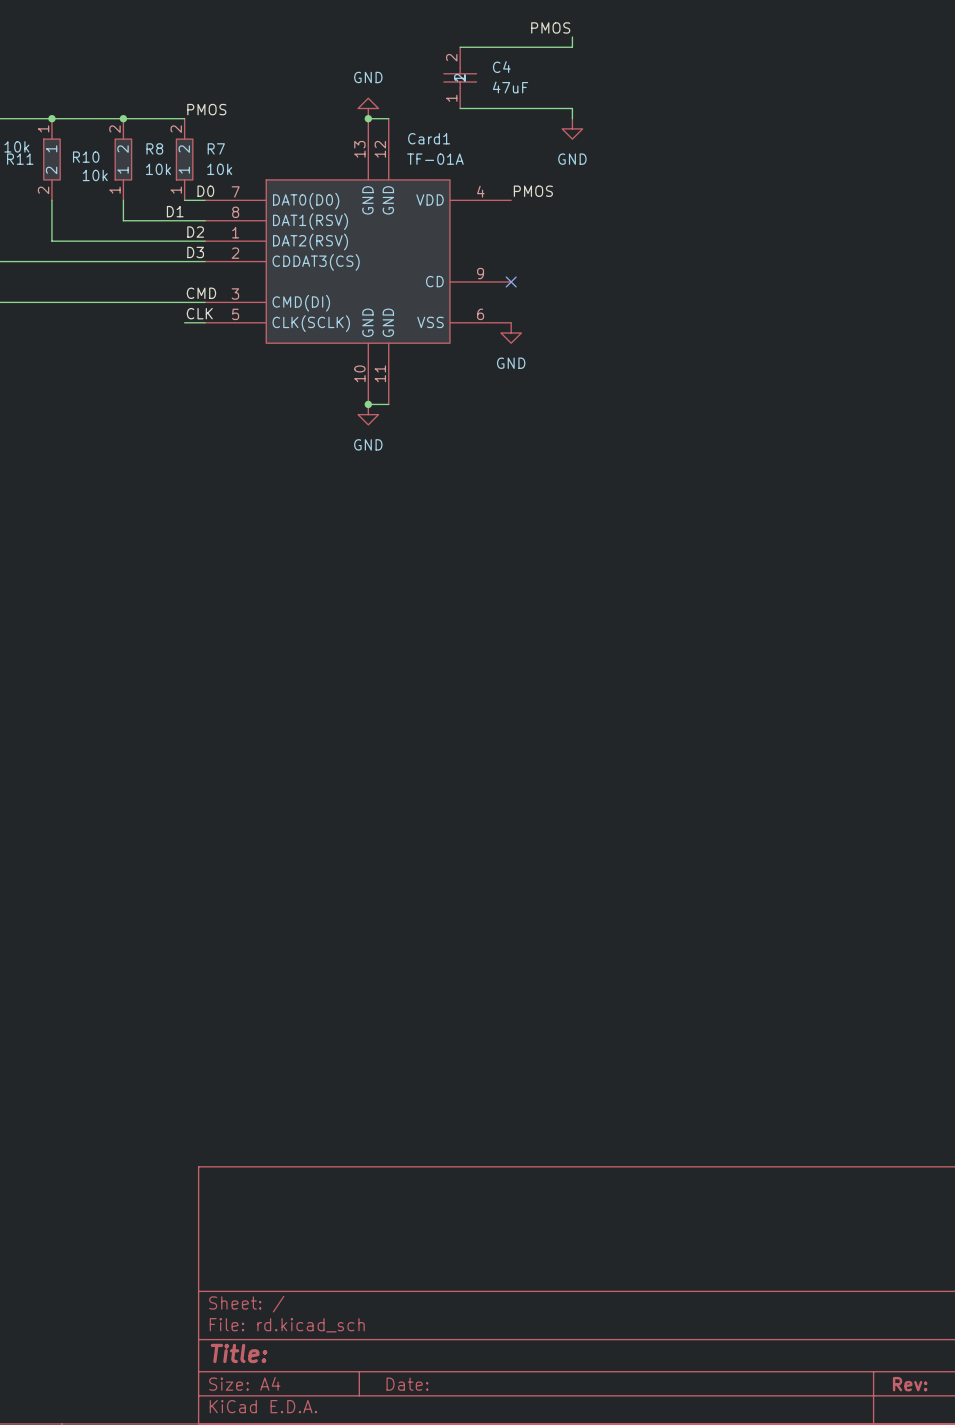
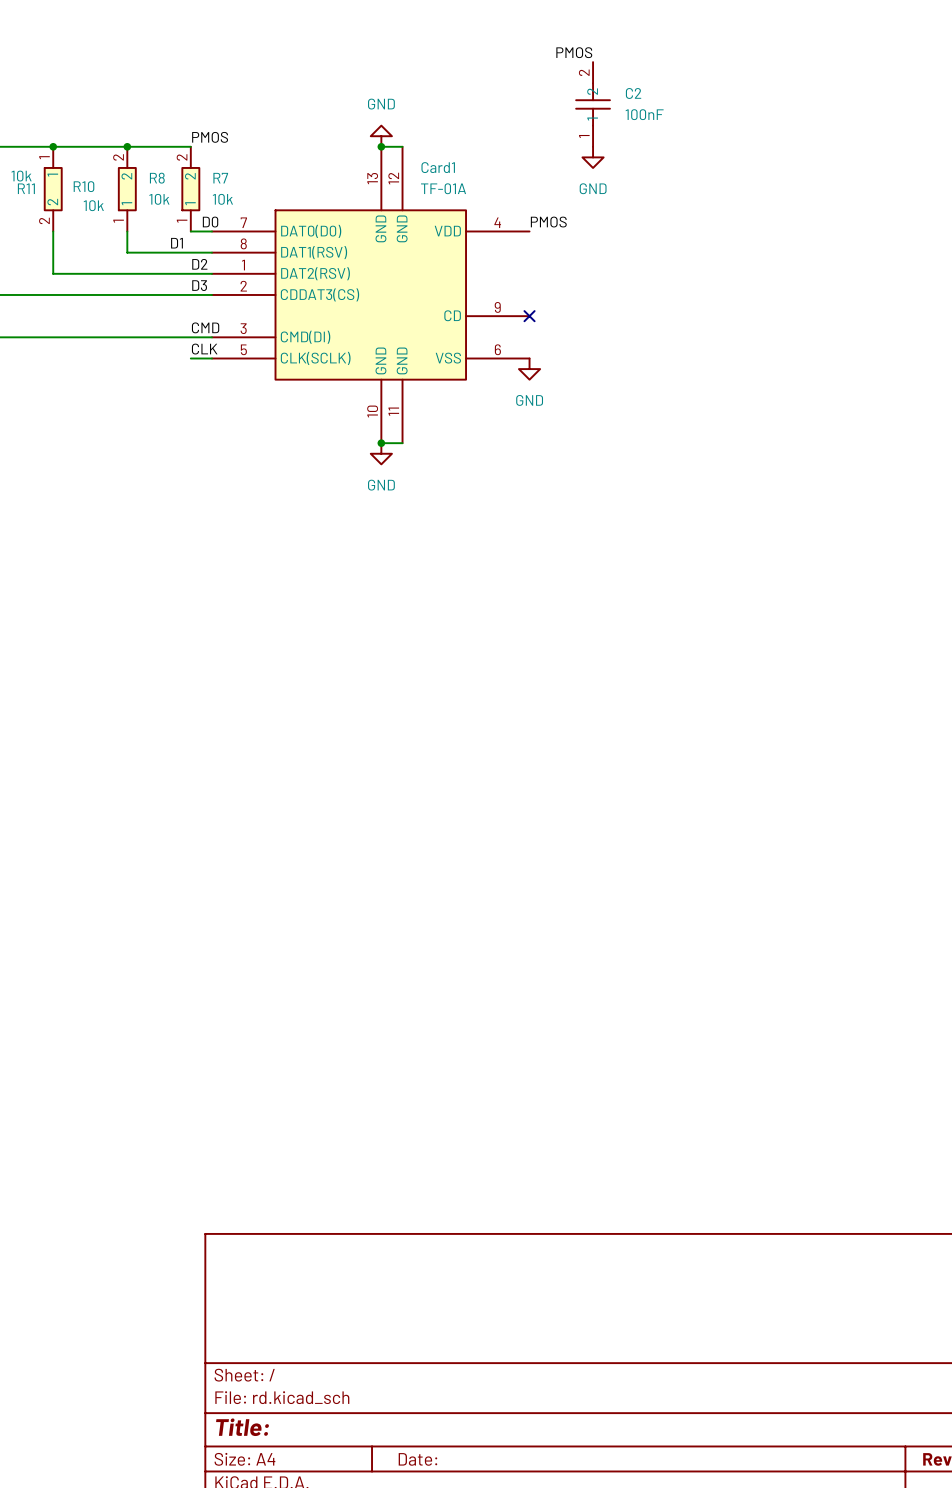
wire: (572, 37) (572, 47) (460, 47) -> none
C4: 47uF (460, 77) -> none
C2: none -> 100nF (593, 104)
wire: (460, 108) (572, 108) (572, 118) -> none

